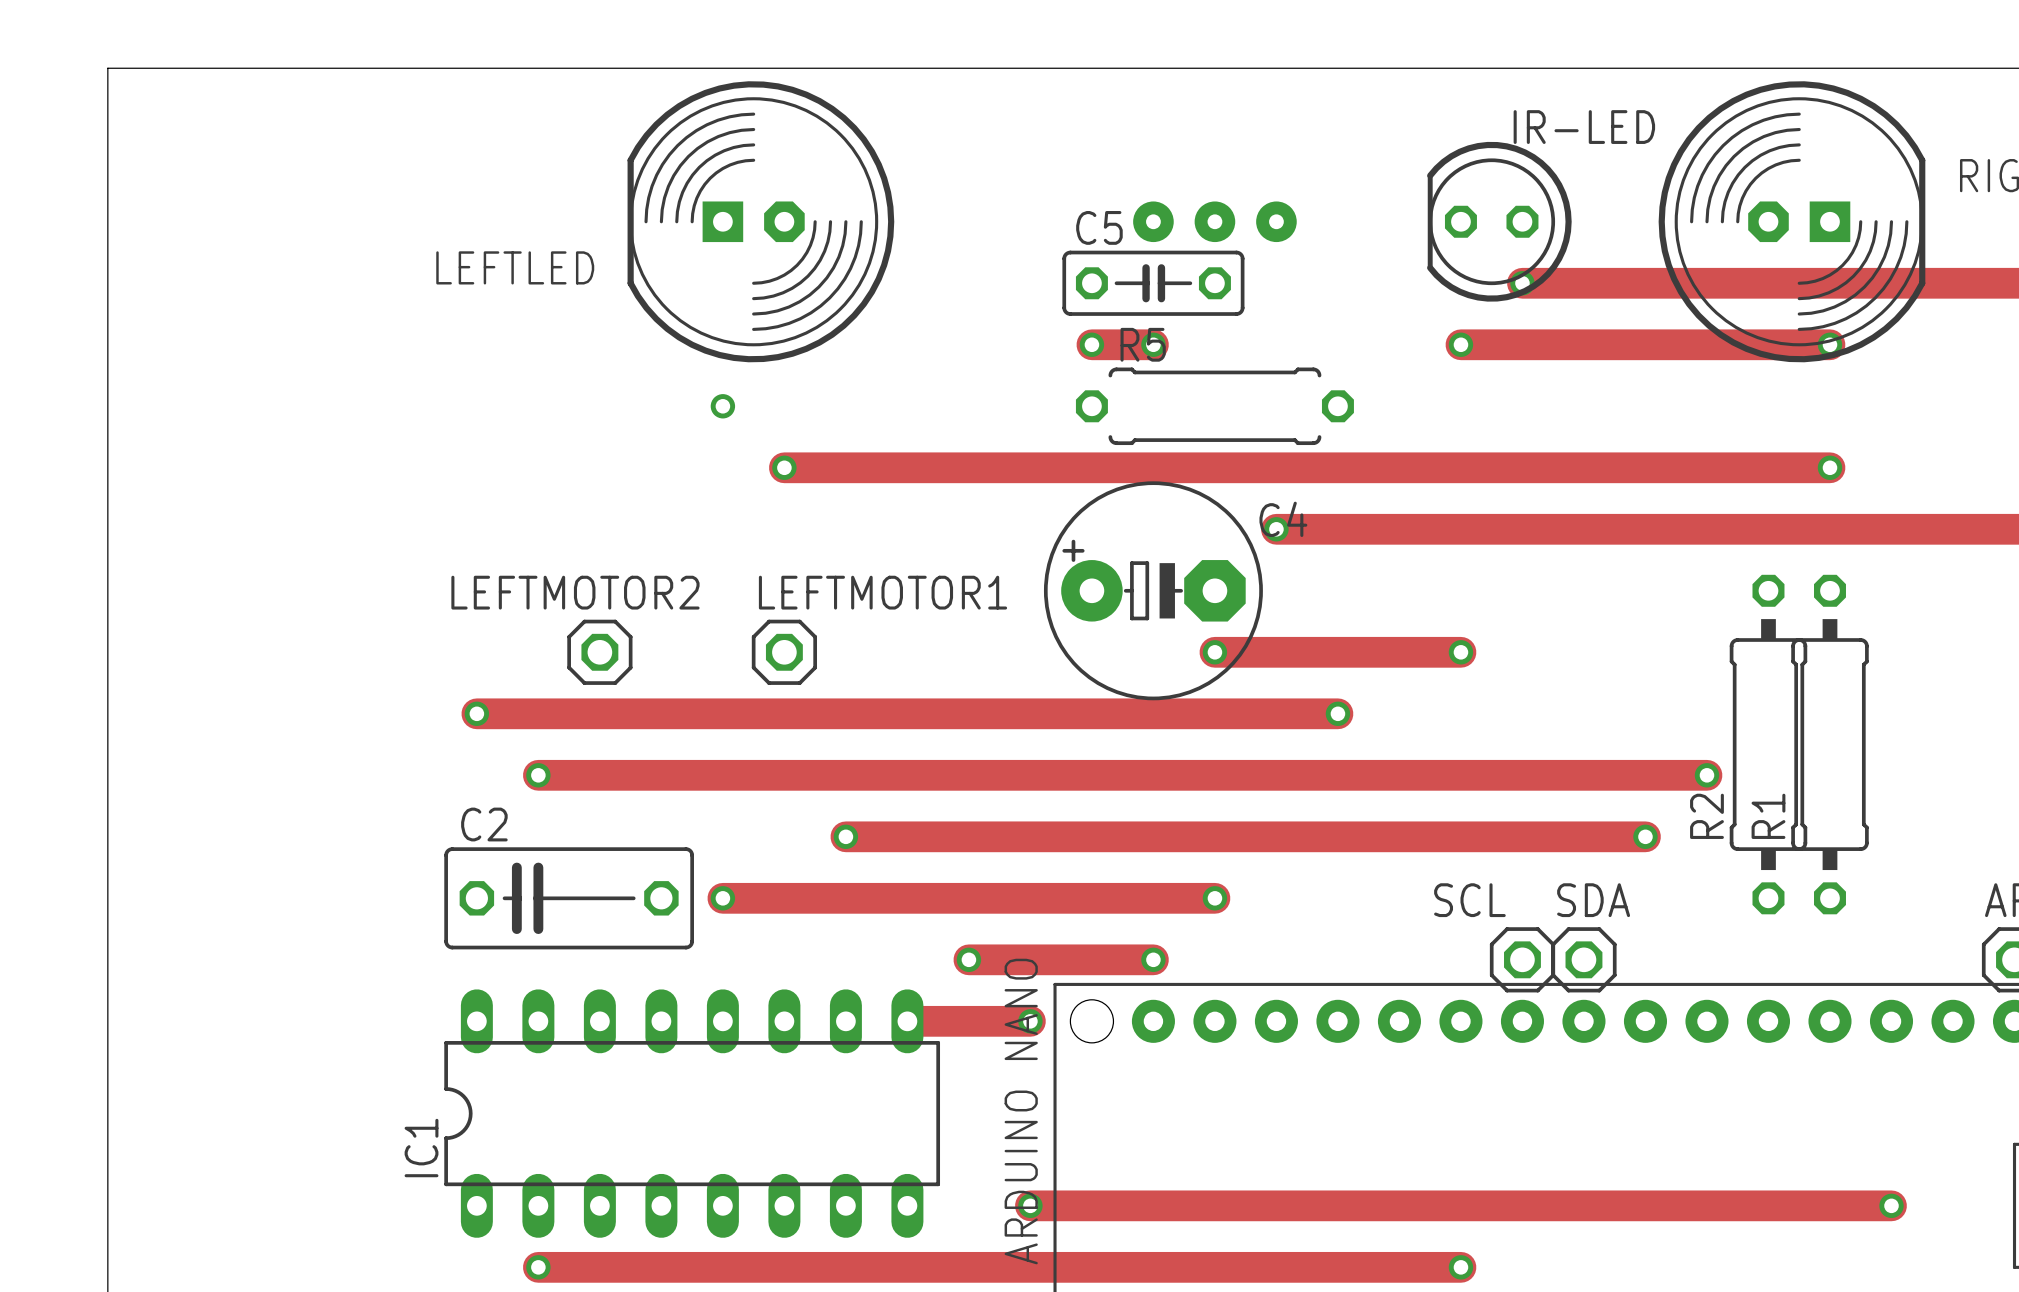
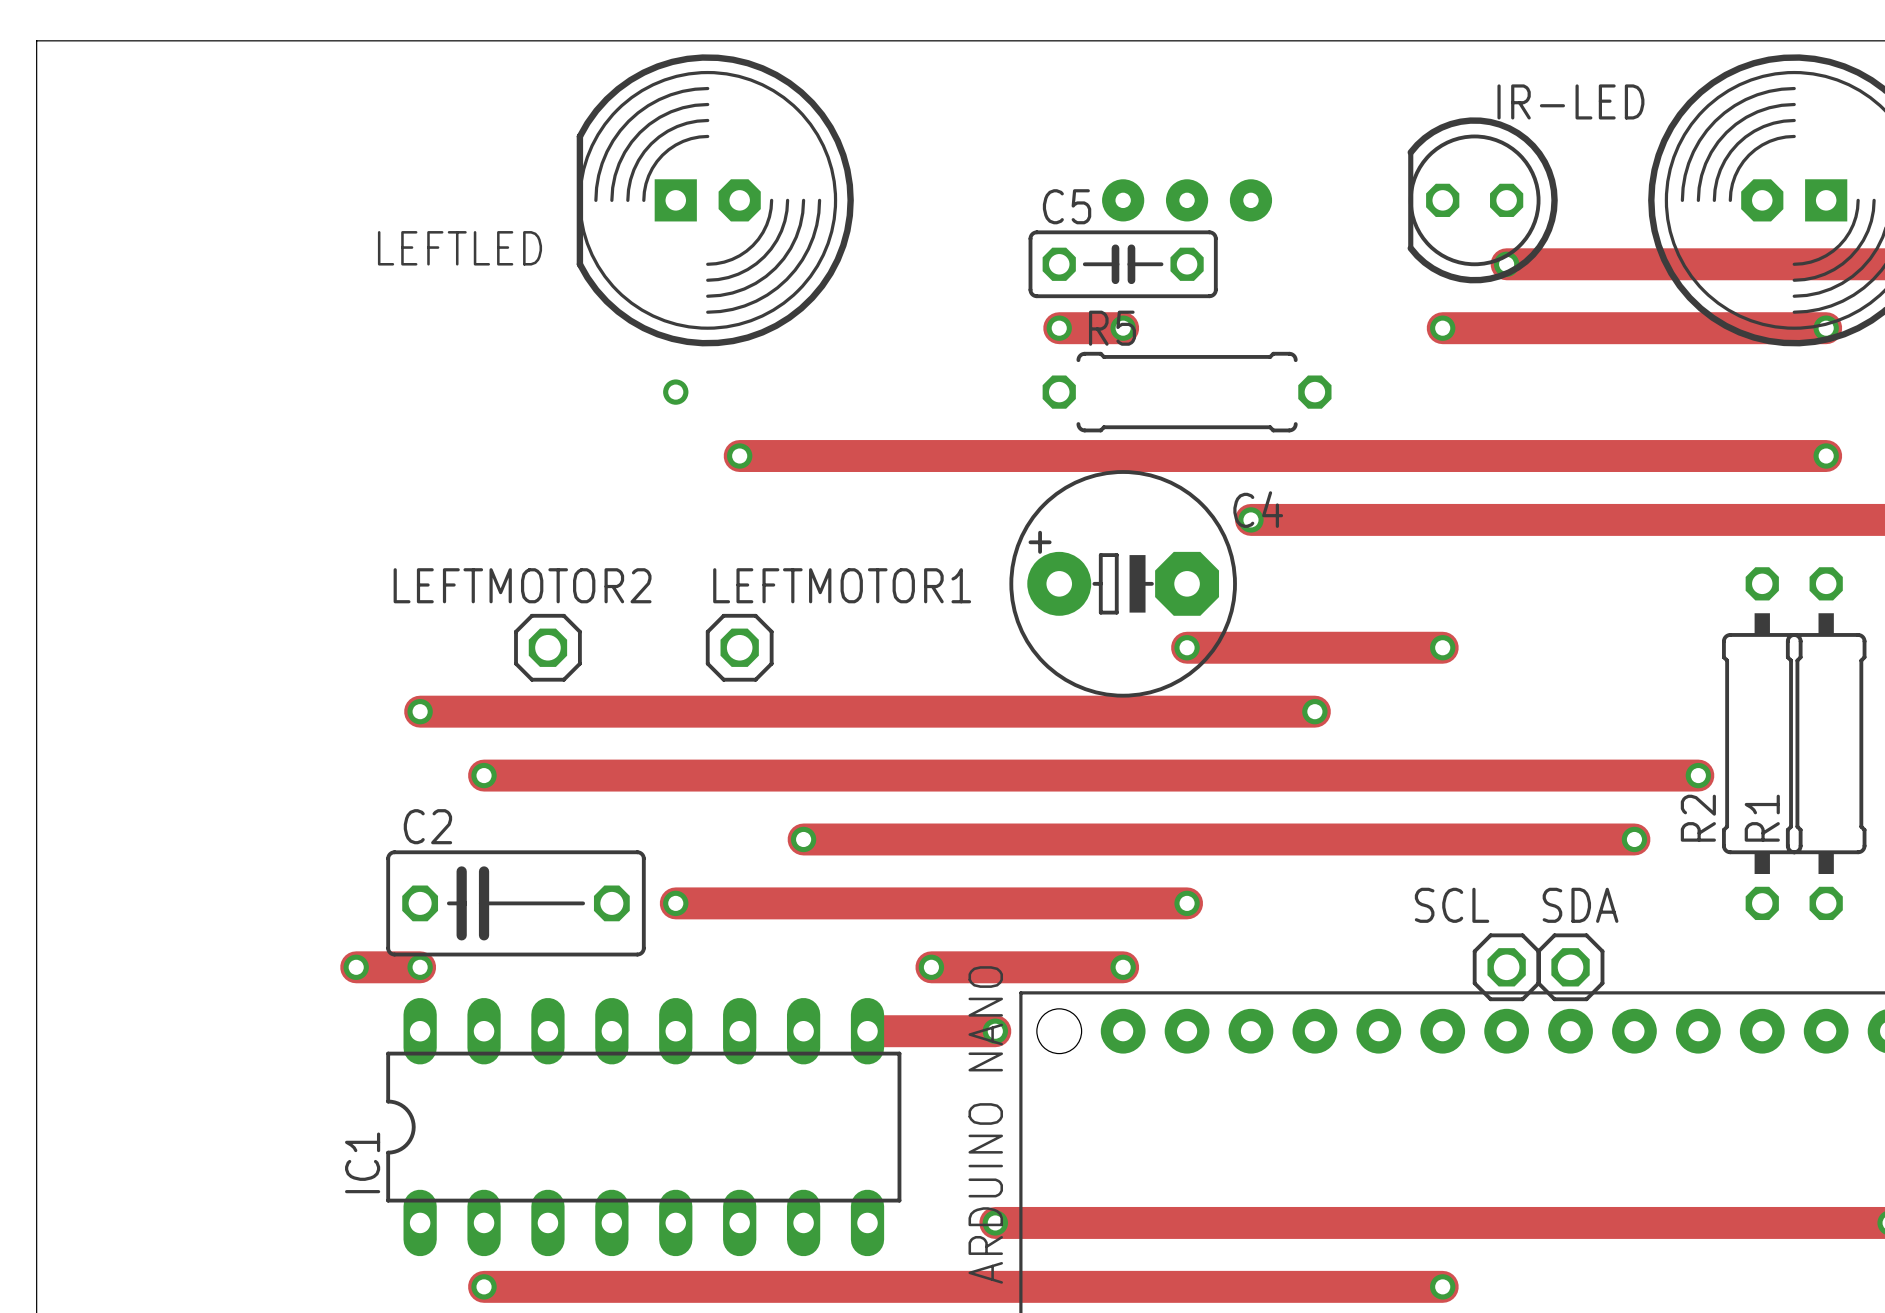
track: none -> (356, 967) (420, 967)
via: none -> (356, 967)
via: none -> (420, 967)

